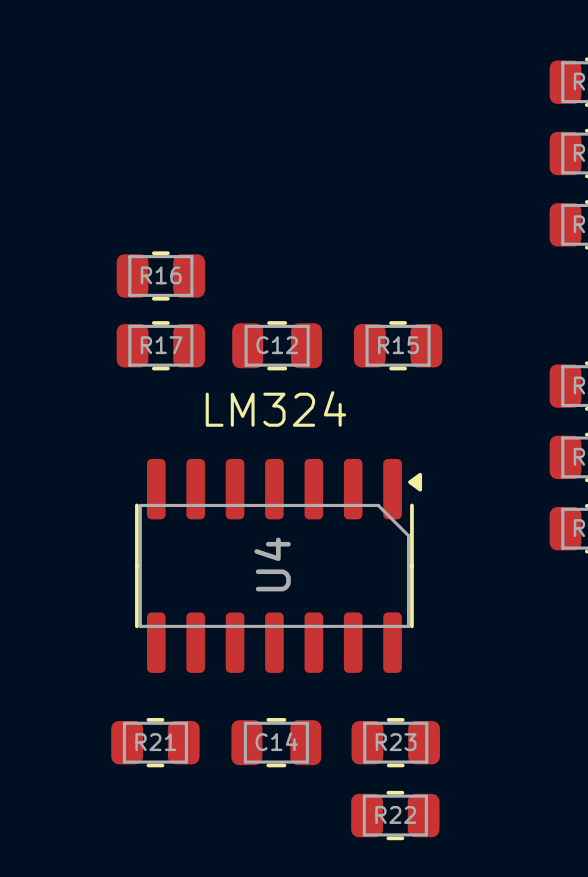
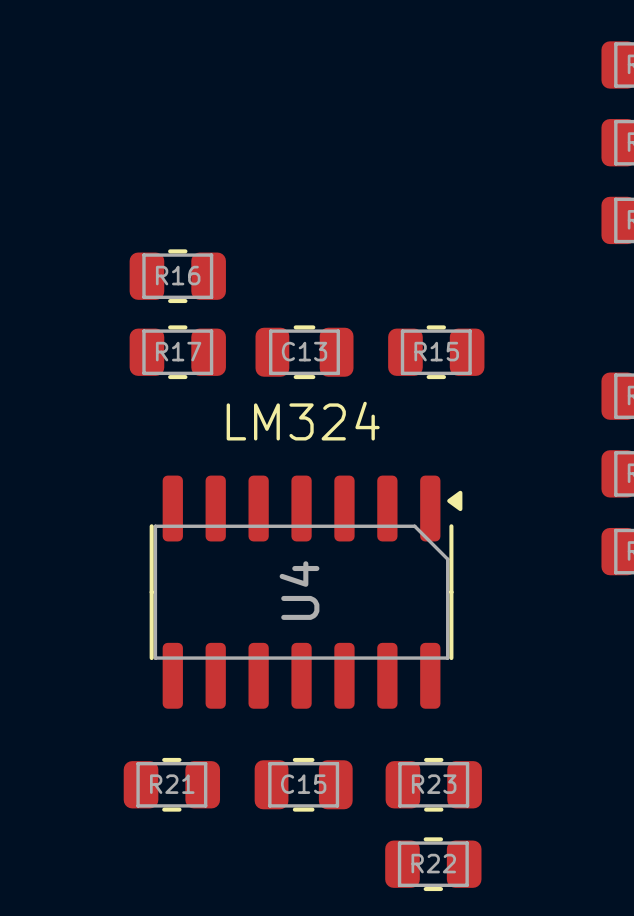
C12 name: C12 (277, 345) -> C13 (304, 351)
C14 name: C14 (276, 741) -> C15 (303, 784)

